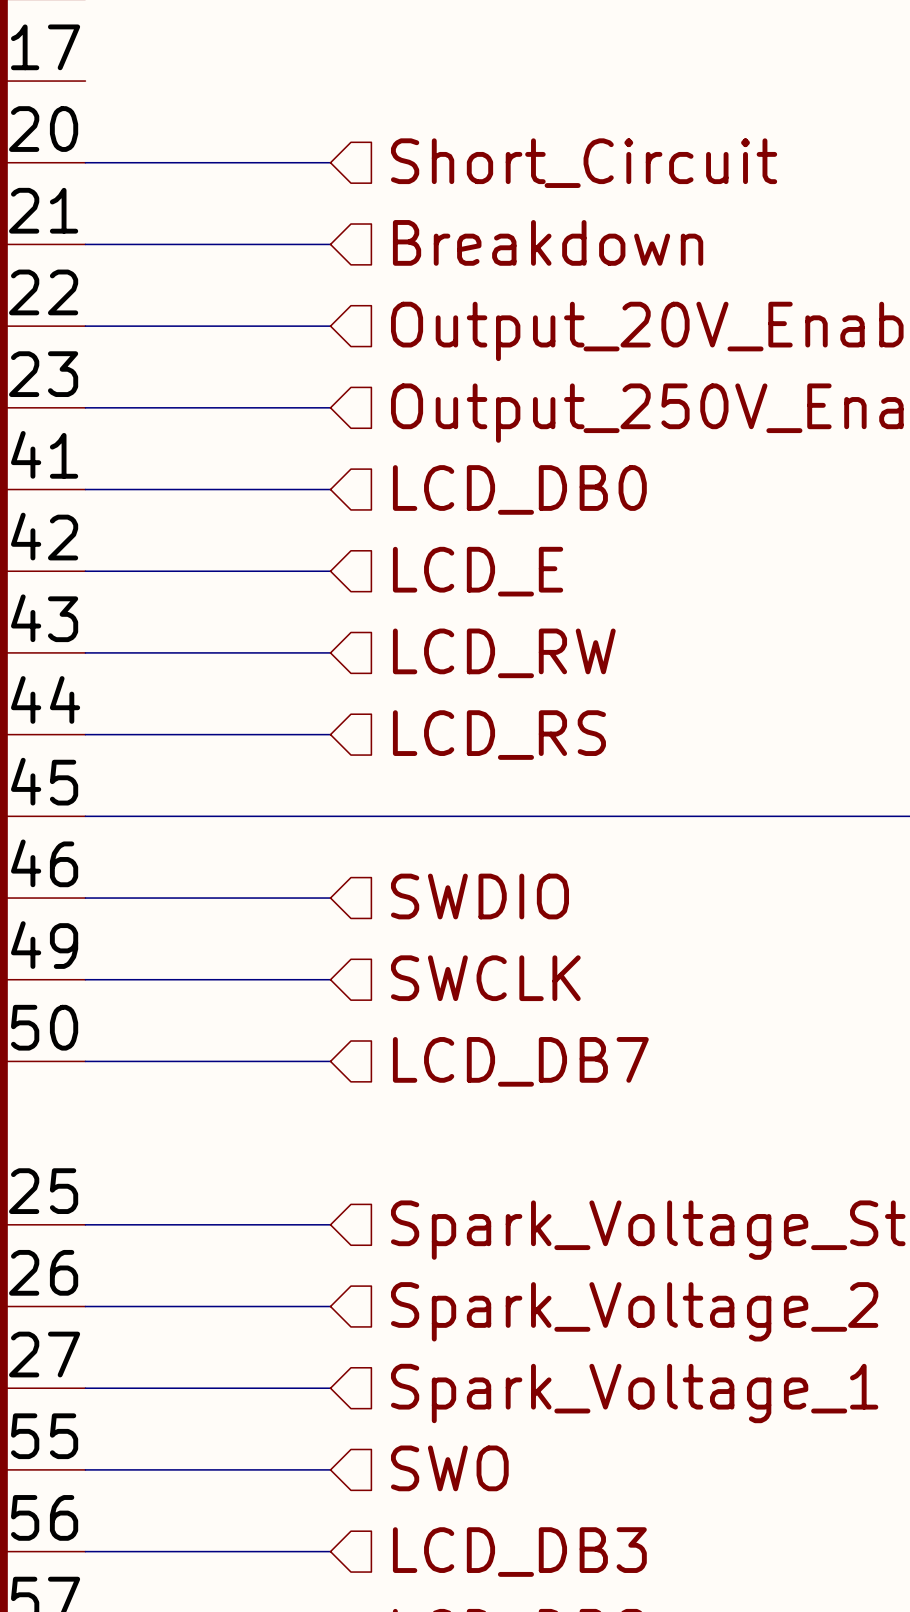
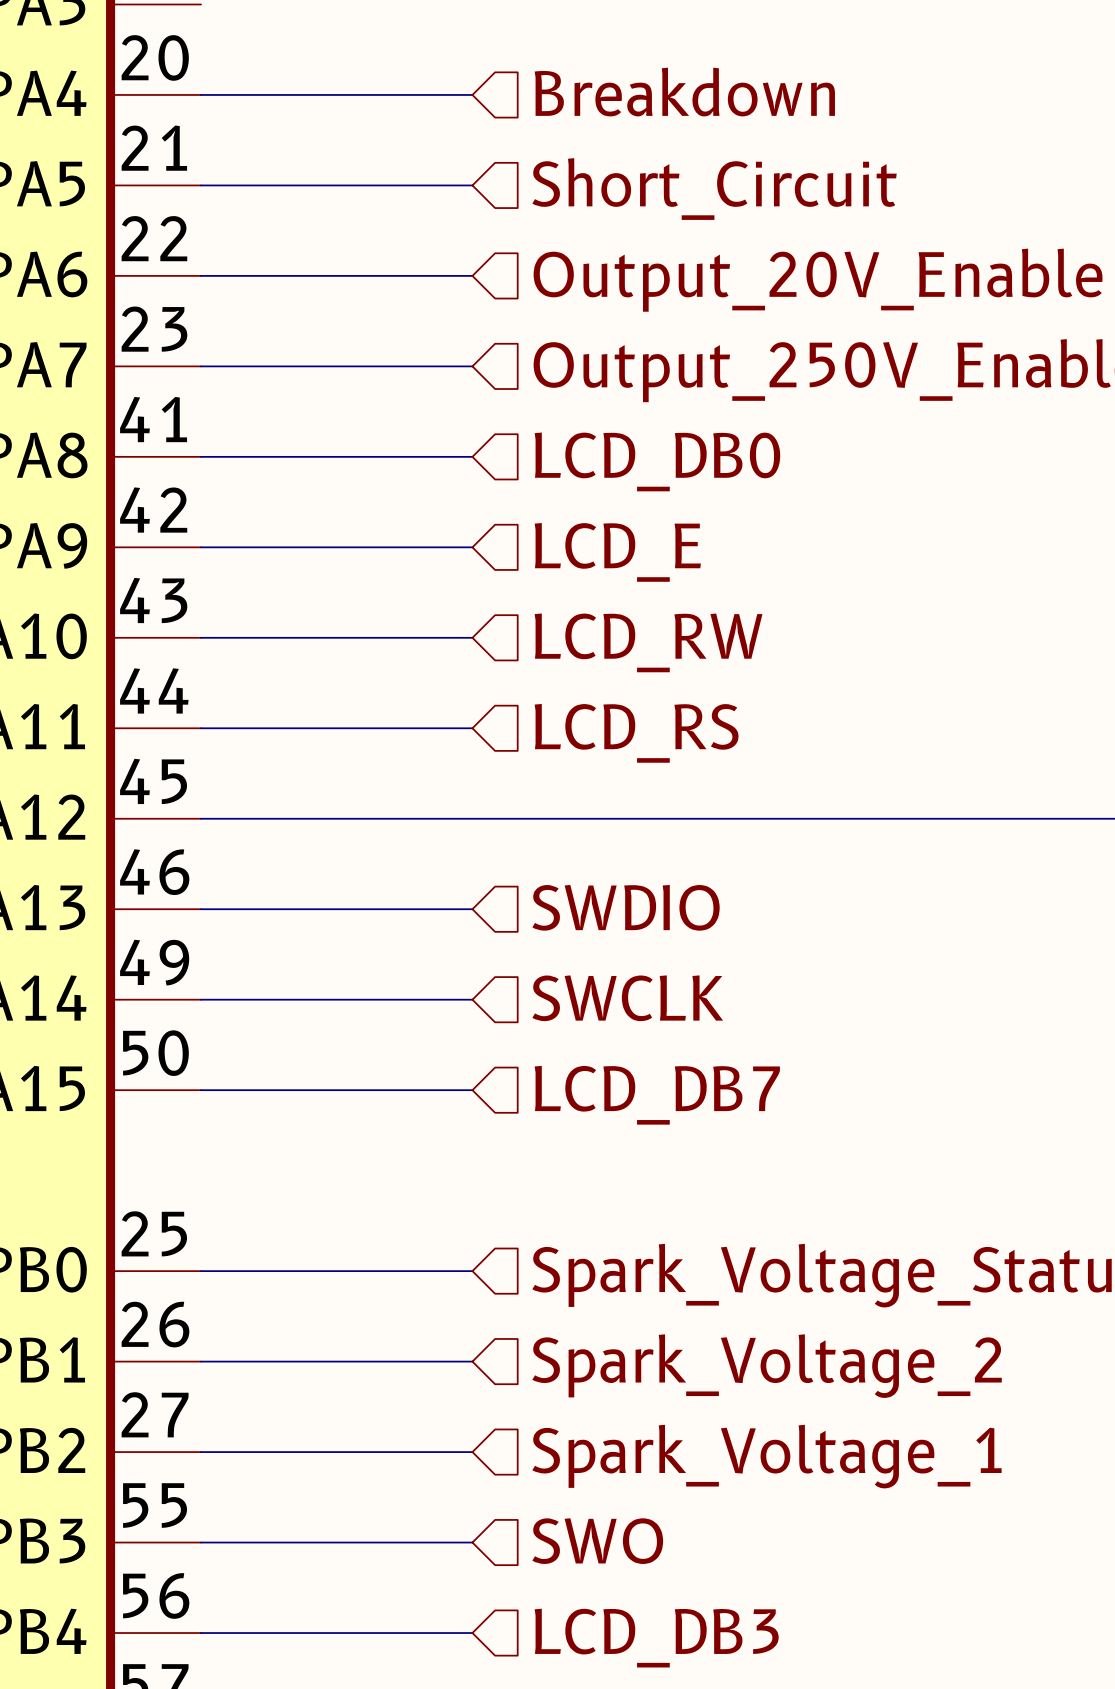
hierarchical label: Short_Circuit (584, 163) -> Breakdown (684, 92)
hierarchical label: Breakdown (548, 242) -> Short_Circuit (714, 189)

